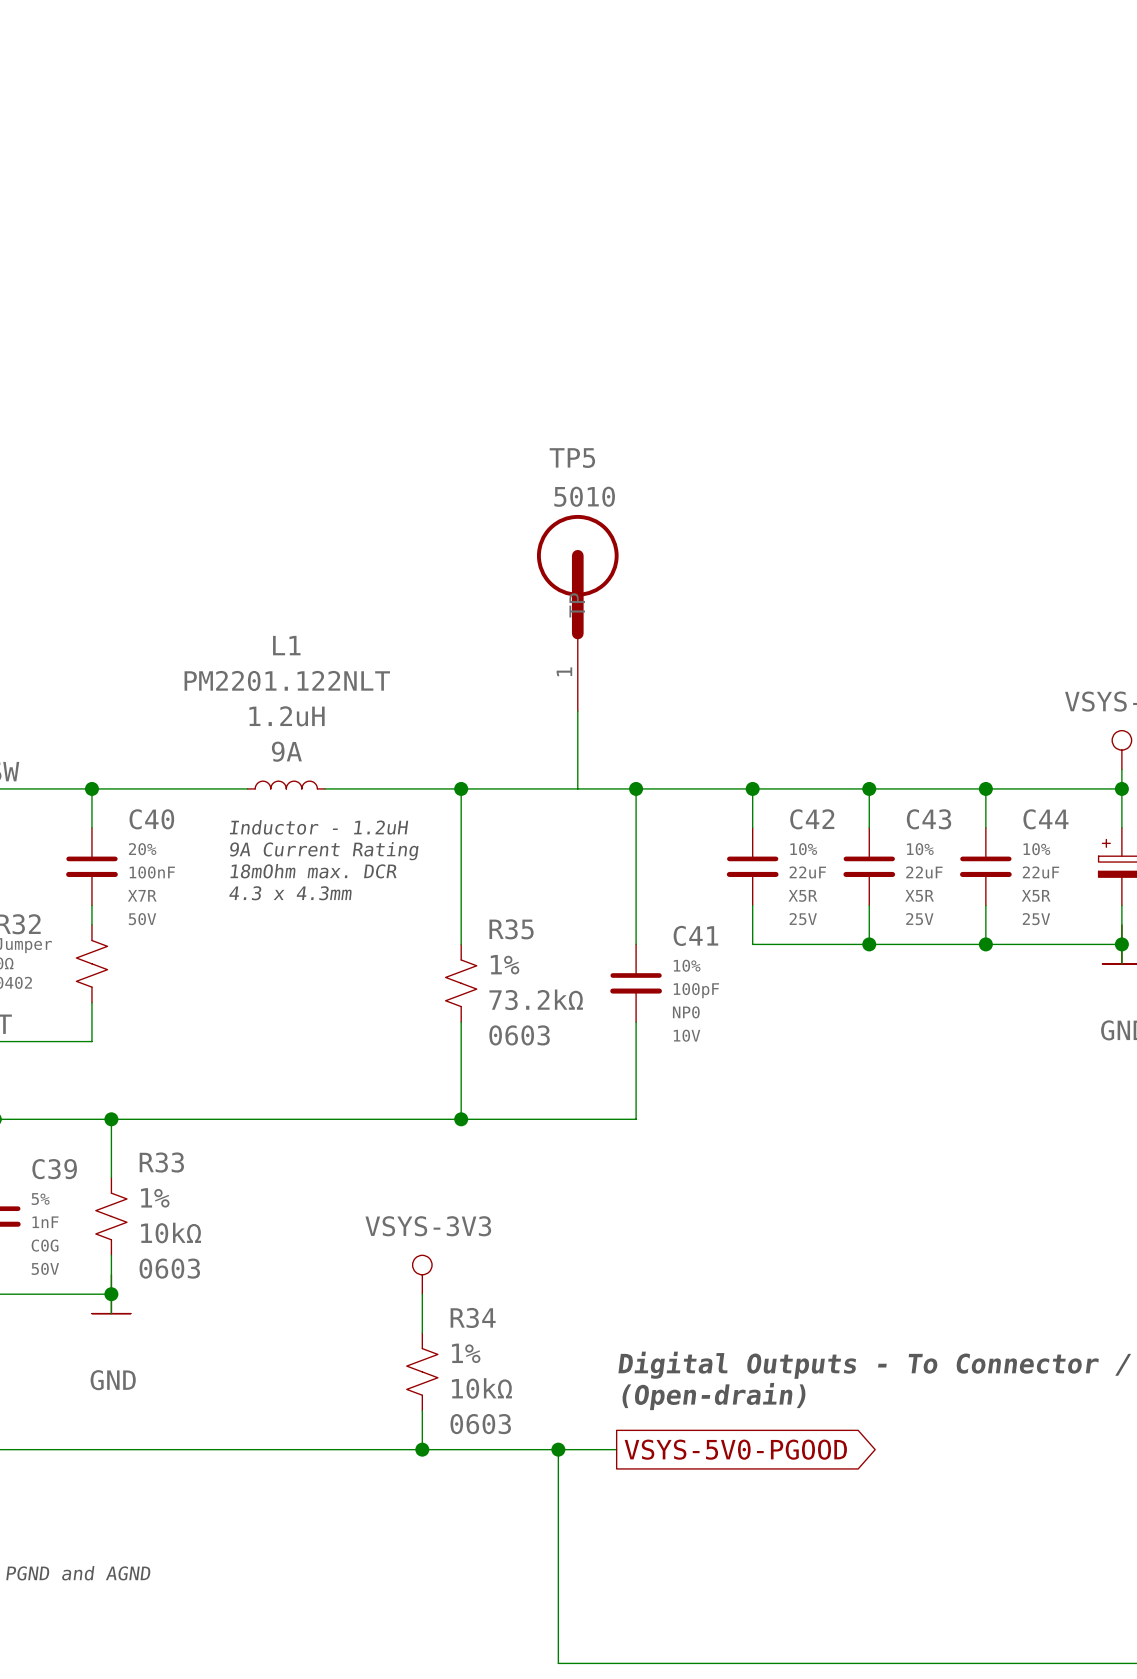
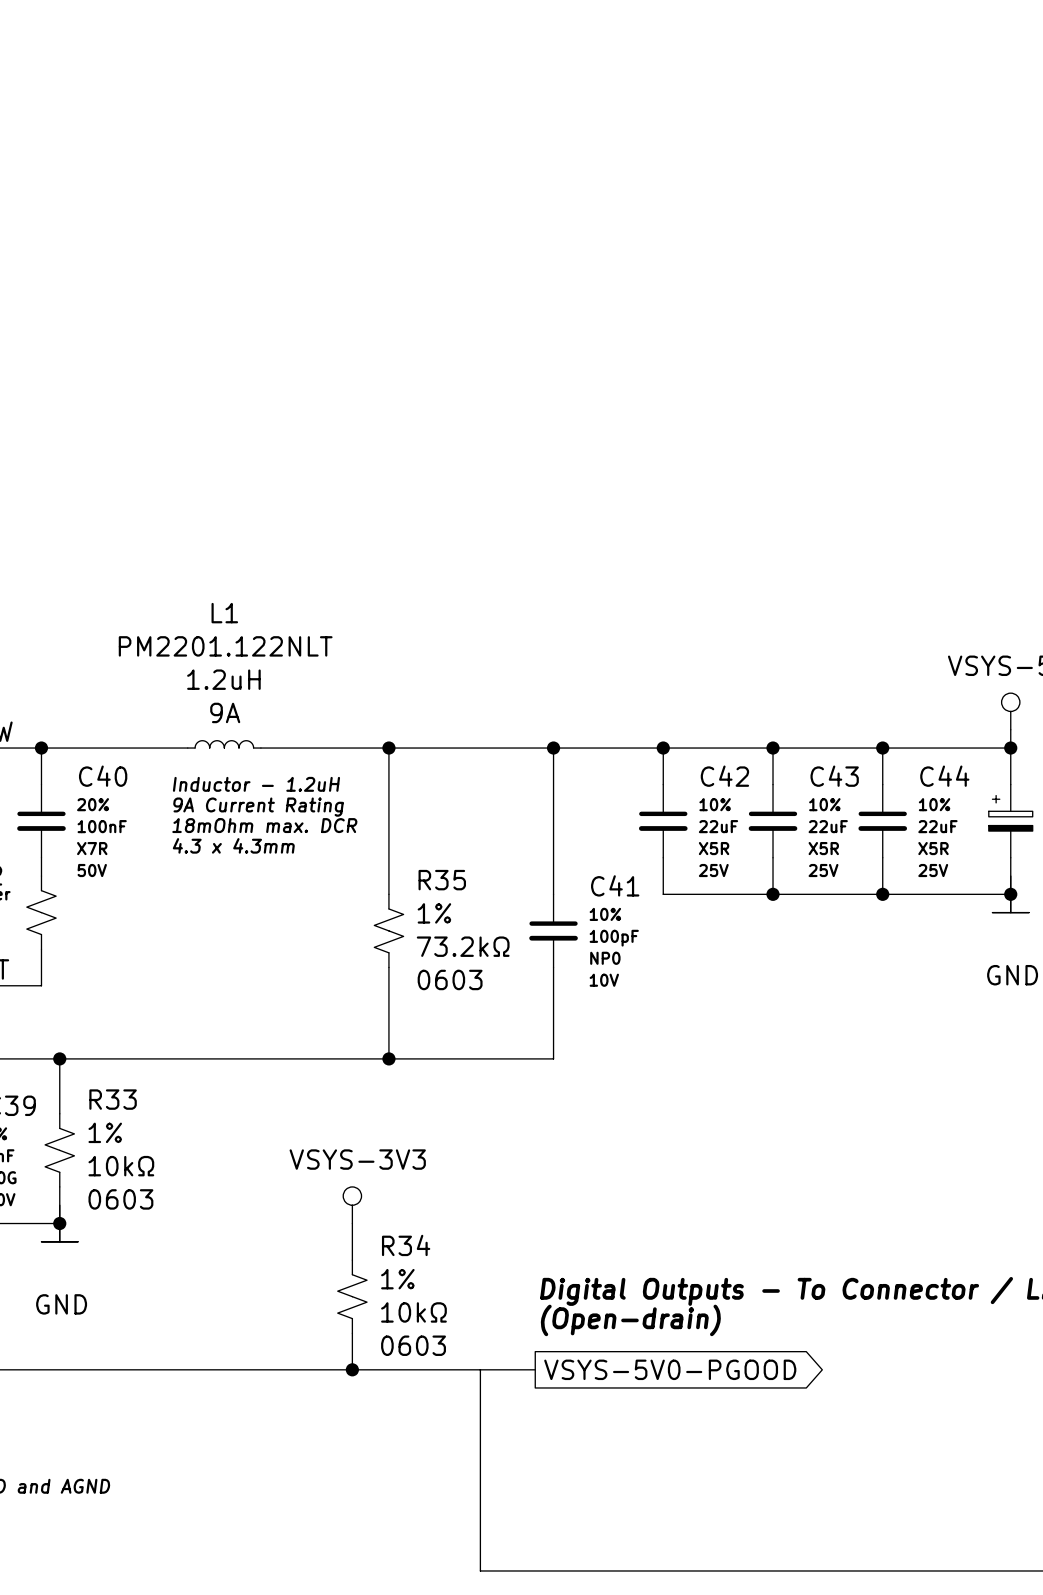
TP5: (577, 613) -> none
wire: (577, 711) (577, 788) -> none
junction: (558, 1449) -> none

